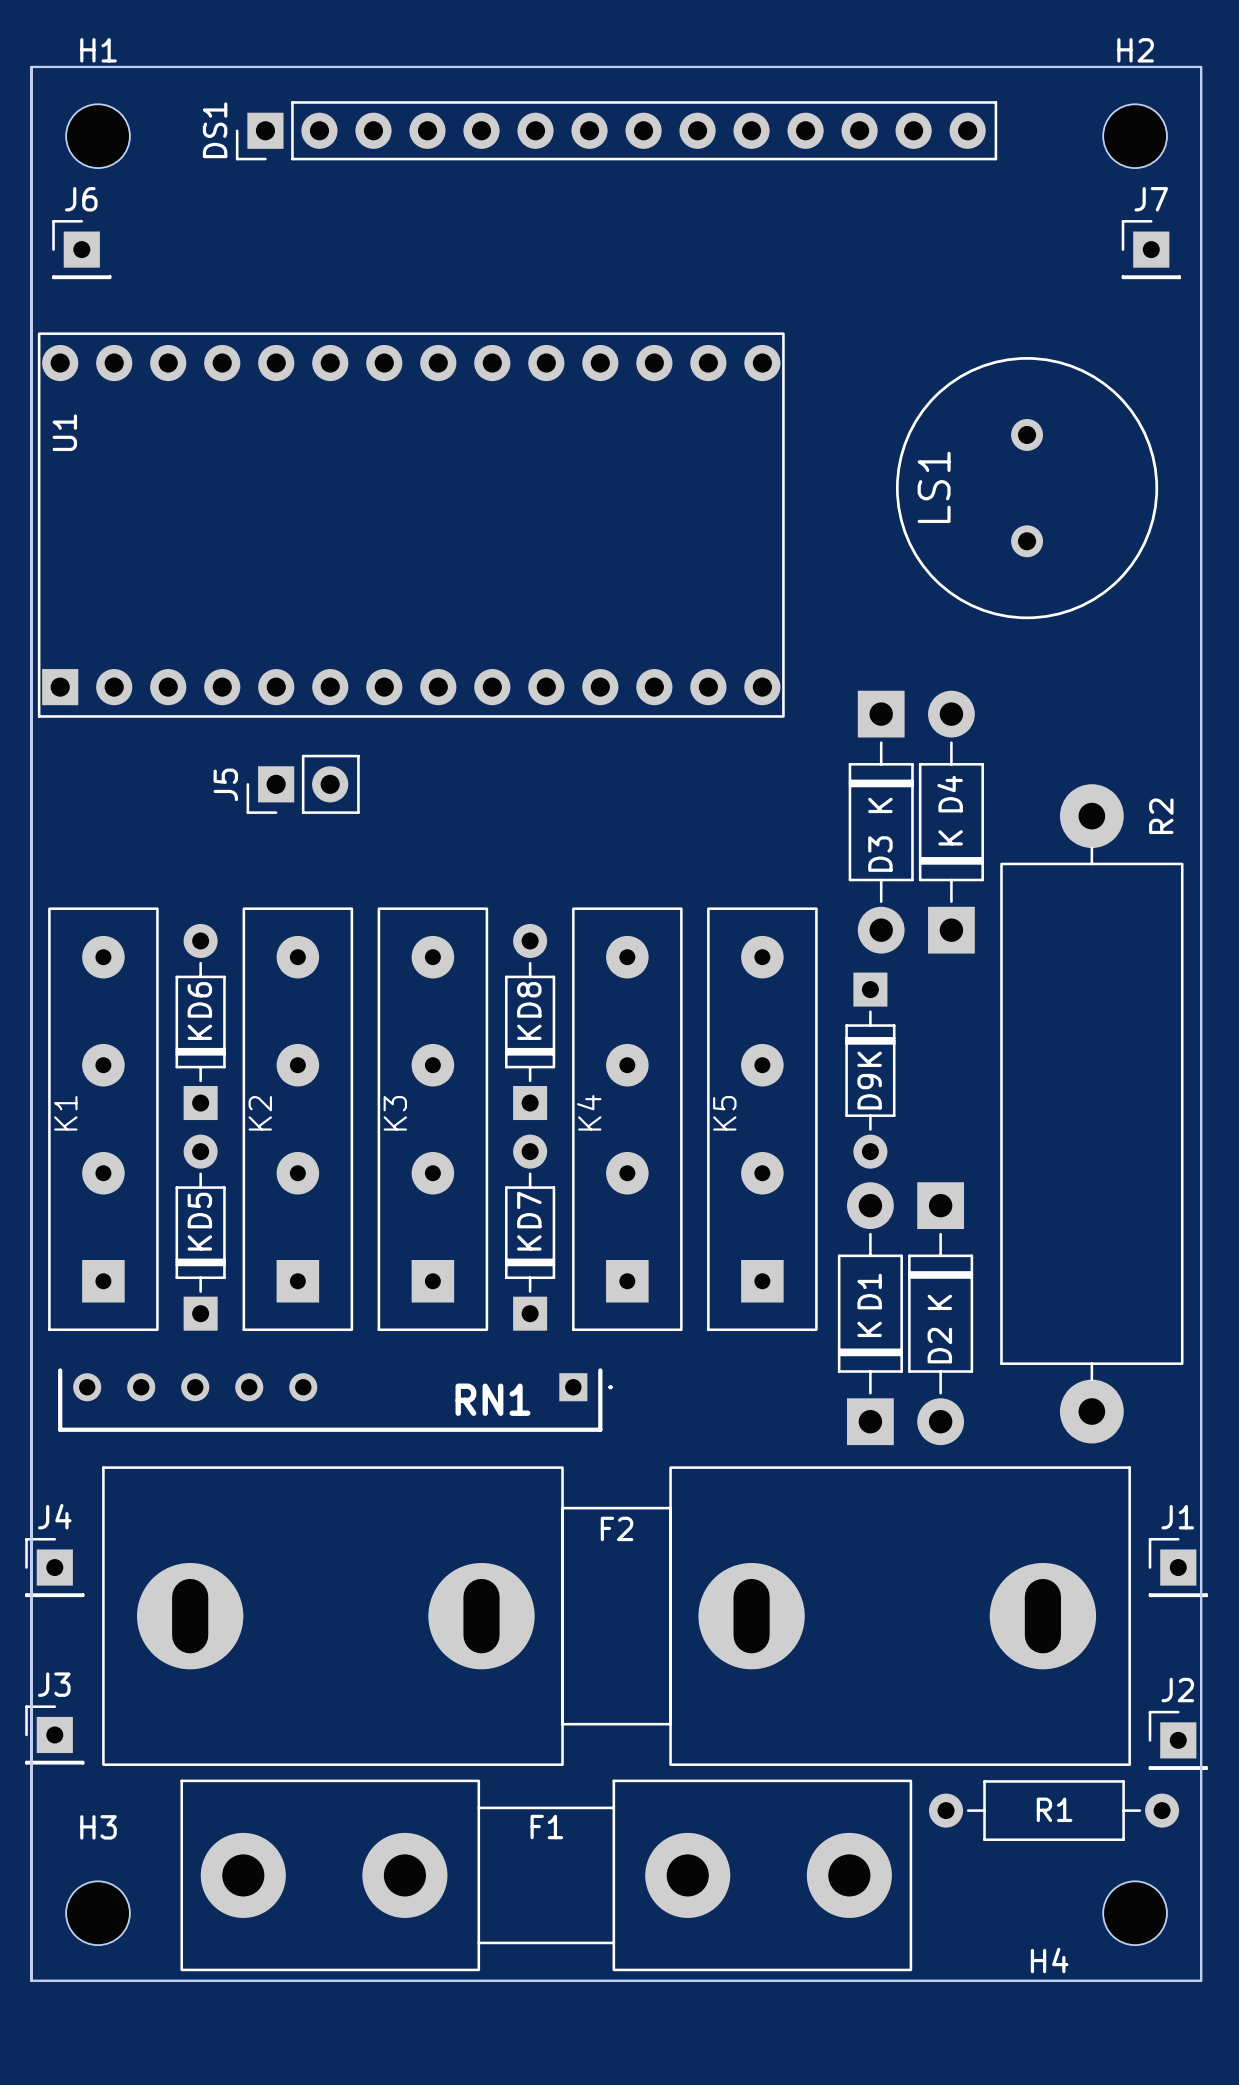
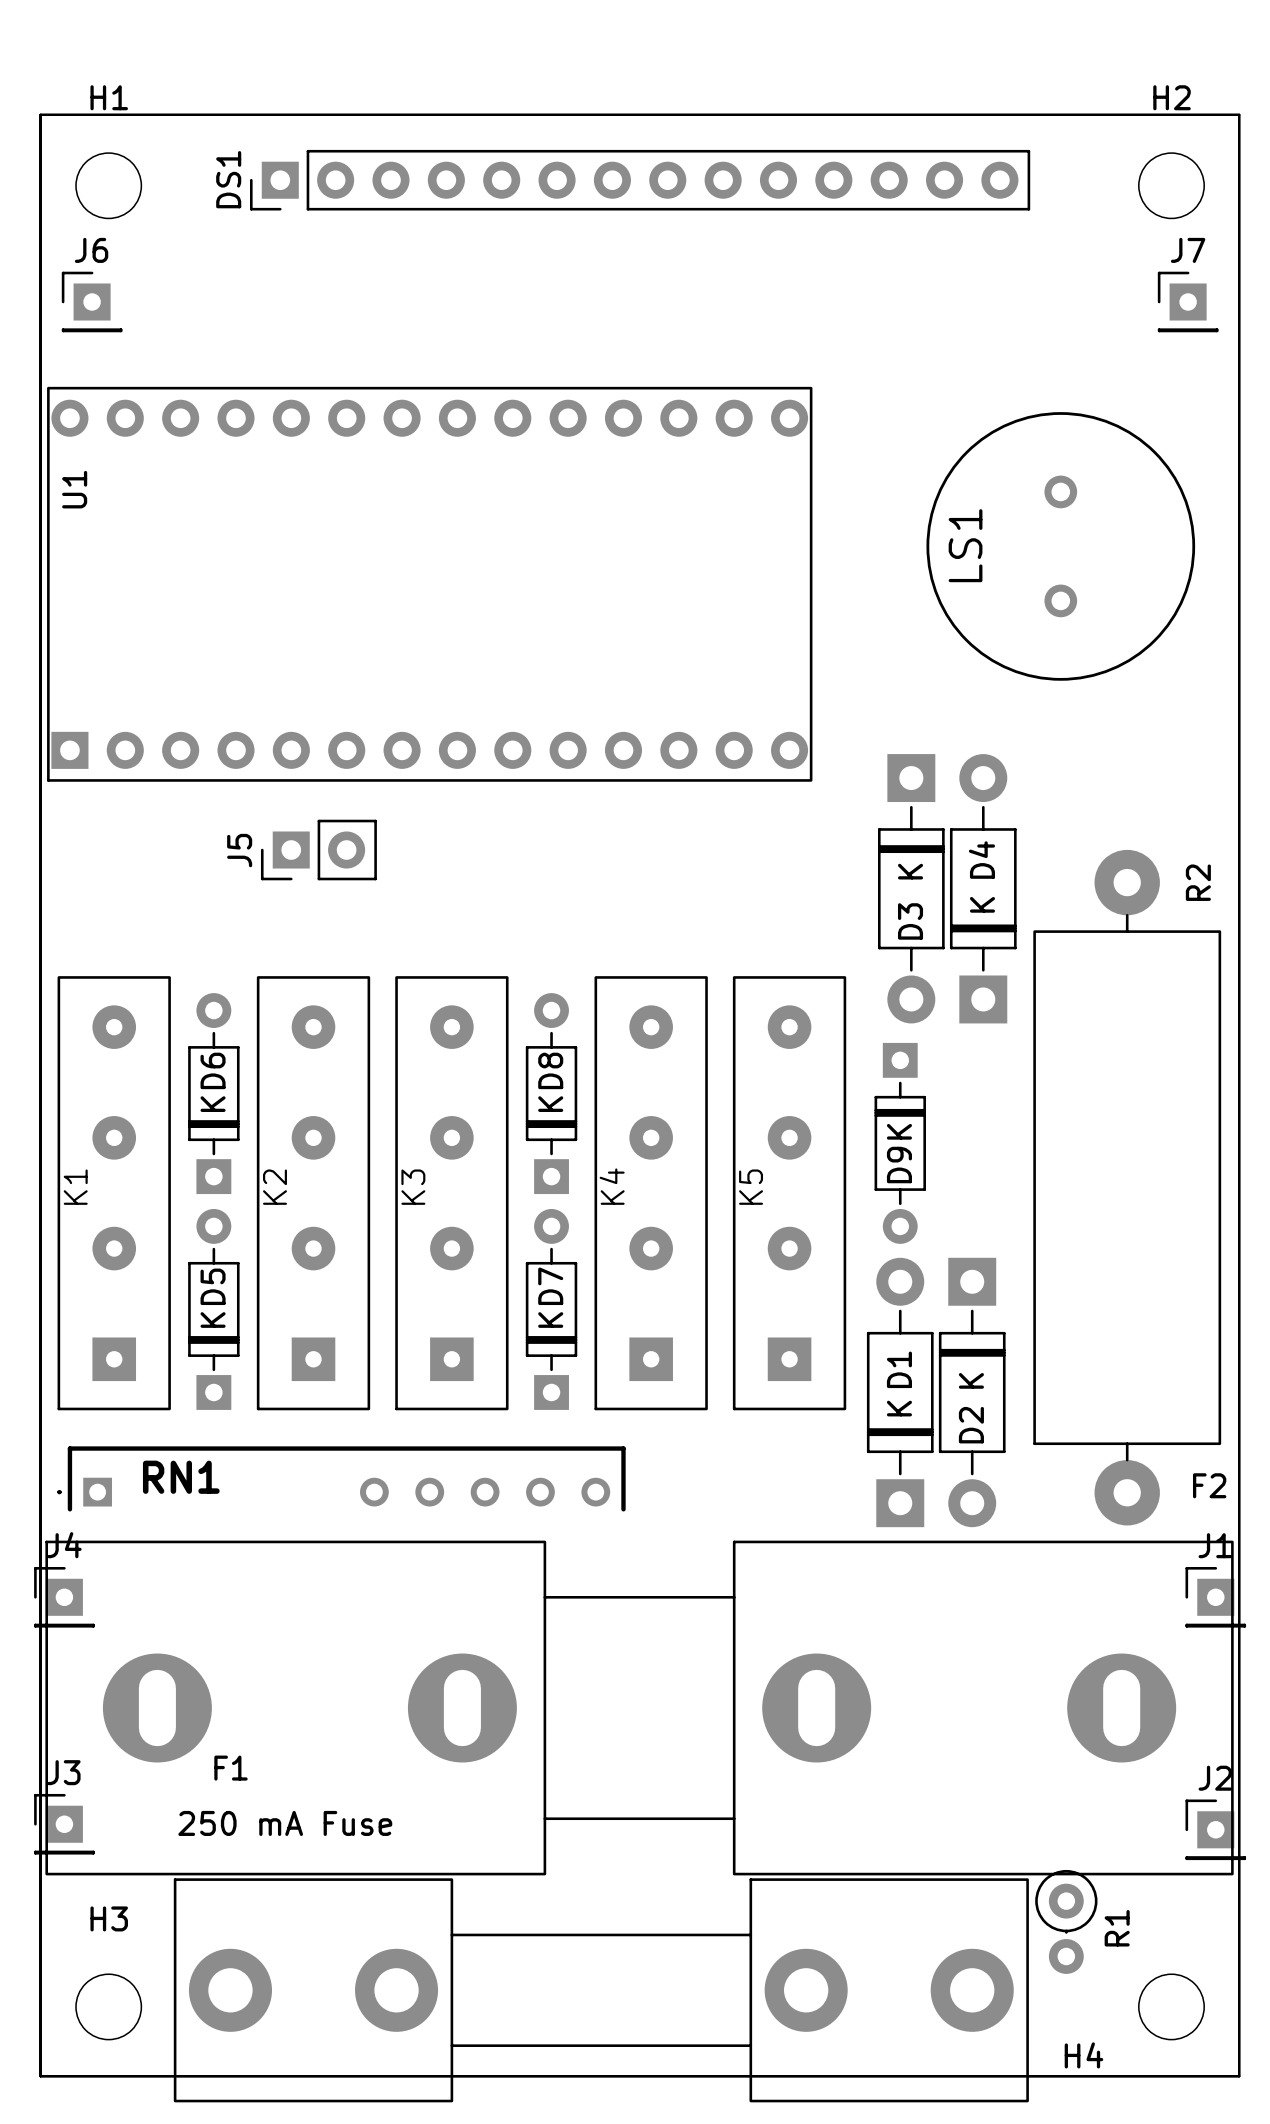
RN1 rotation: 0° (335, 1400) -> 180° (341, 1478)
F2 footprint: [102, 1466, 1131, 1766] -> [45, 1540, 1234, 1876]
F2 name position: F2 (617, 1528) -> F2 (1209, 1485)
J4 position: (54, 1567) -> (64, 1597)
J1 position: (1178, 1567) -> (1215, 1597)
F1 footprint: [180, 1779, 913, 1972] -> [173, 1878, 1029, 2103]
R1 footprint: [929, 1780, 1180, 1842] -> [1035, 1869, 1098, 1974]
R1 name position: R1 (1054, 1809) -> R1 (1117, 1928)
F1 name position: F1 (546, 1827) -> F1 (230, 1768)

